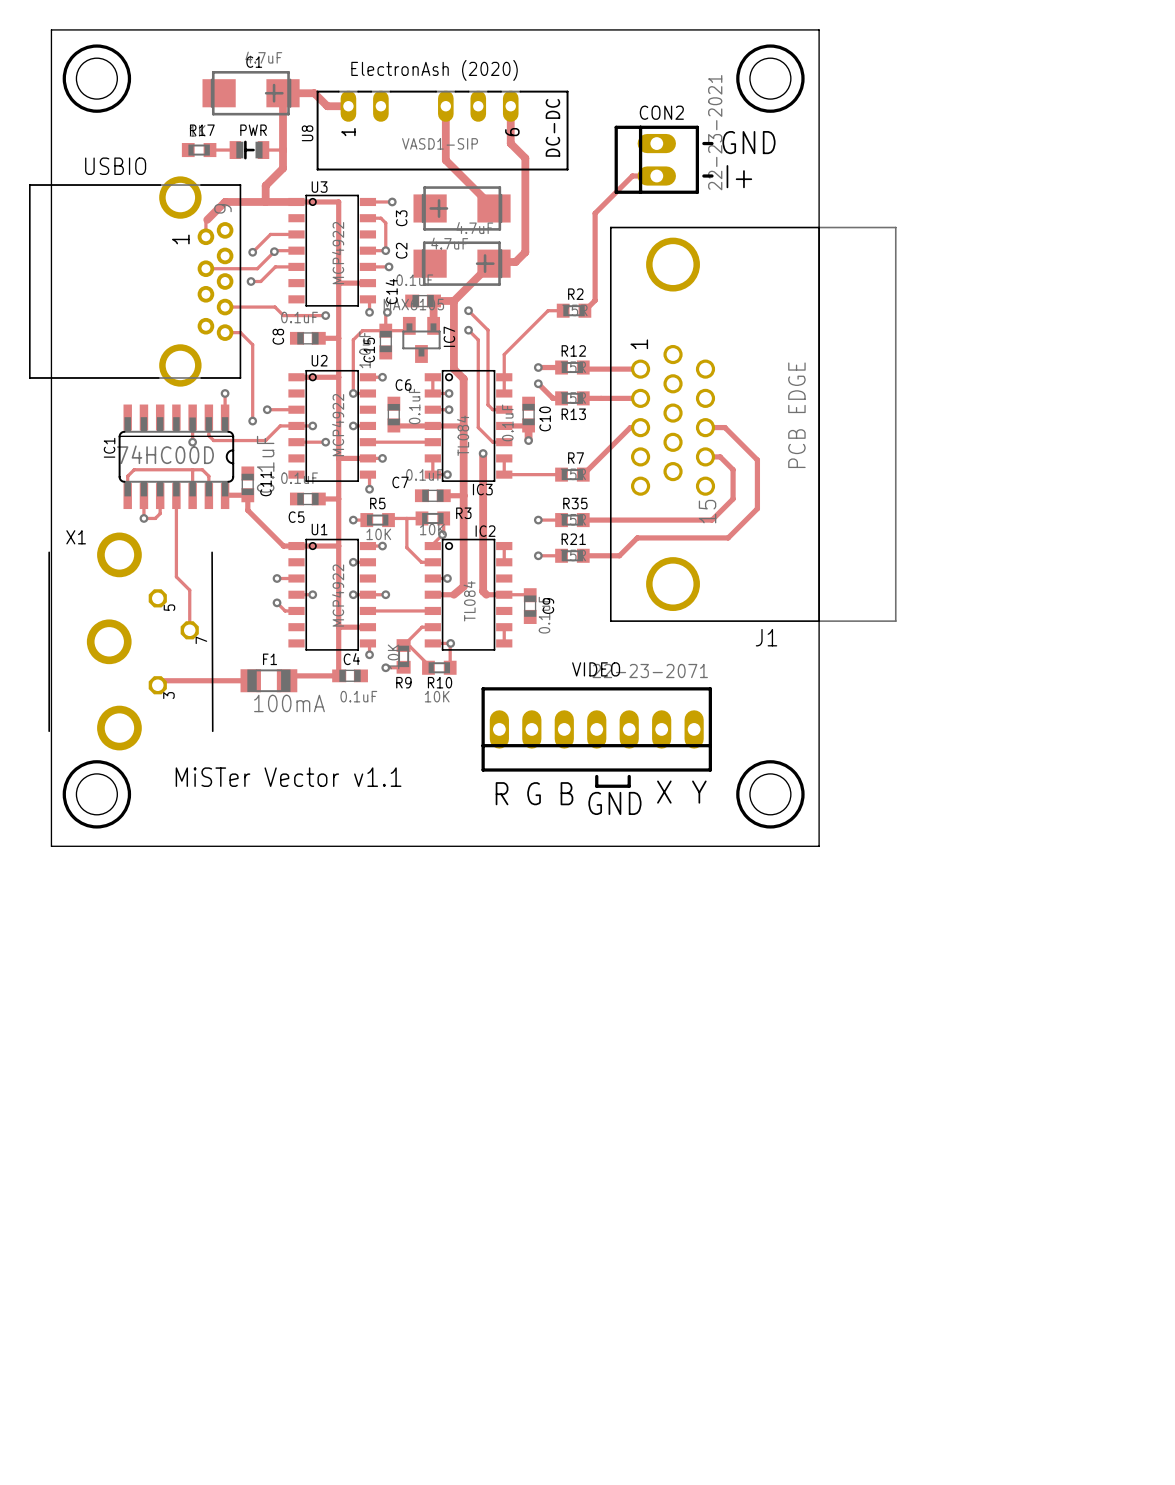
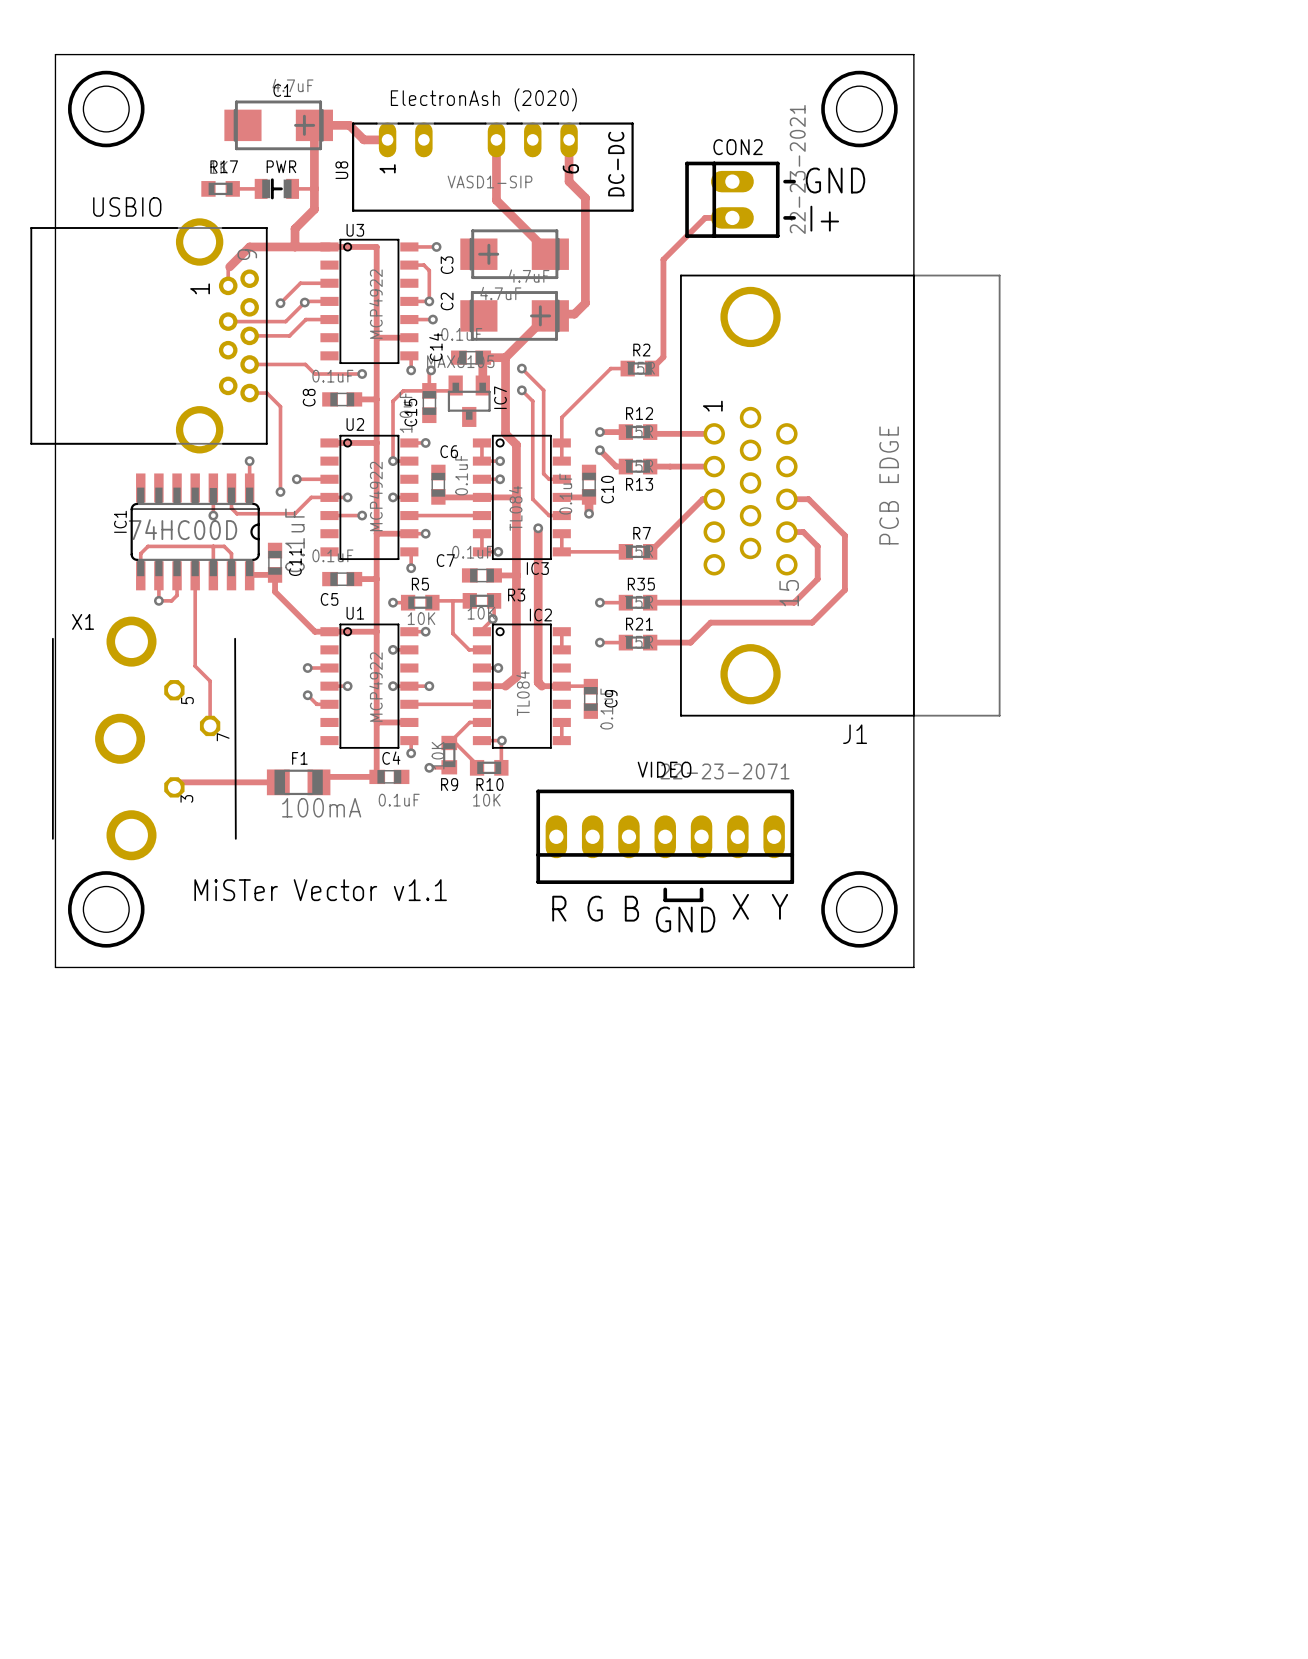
track: none -> (249, 335) (278, 335)
via: (251, 281) -> none

